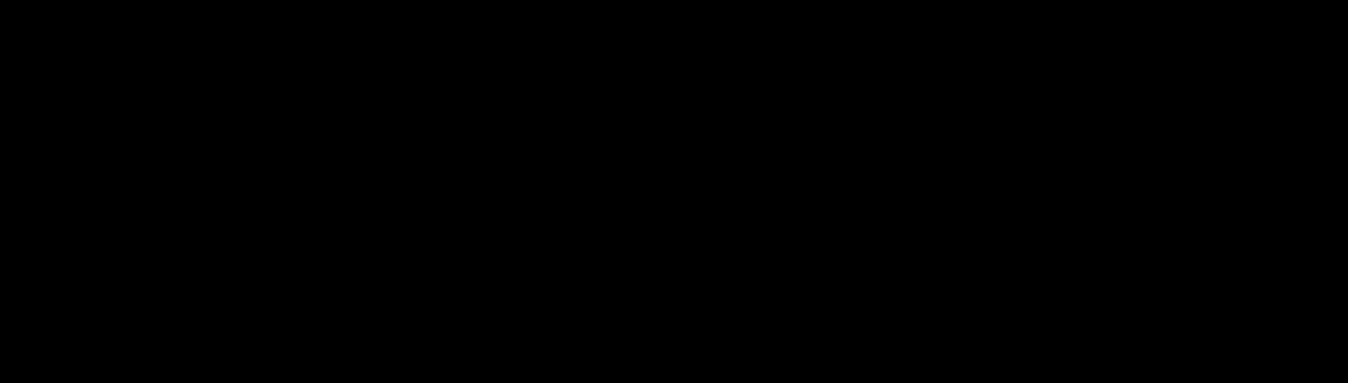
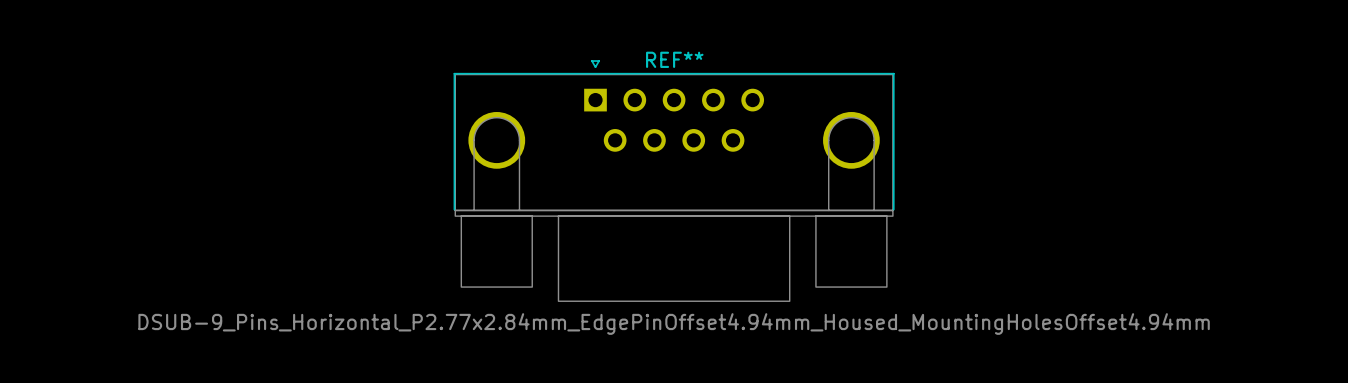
REF**: none -> DSUB-9_Pins_Horizontal_P2.77x2.84mm_EdgePinOffset4.94mm_Housed_MountingHolesOffset4.94mm (674, 181)

